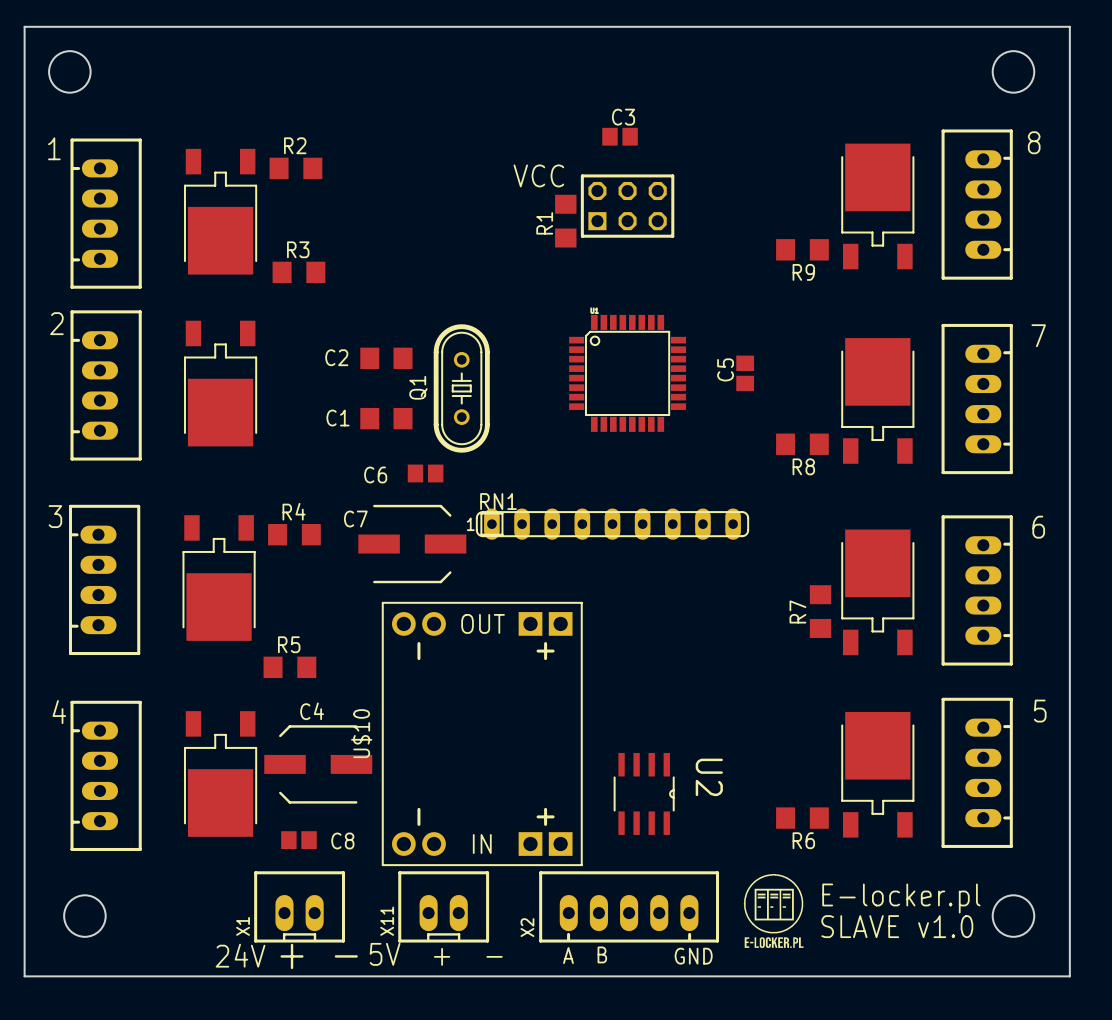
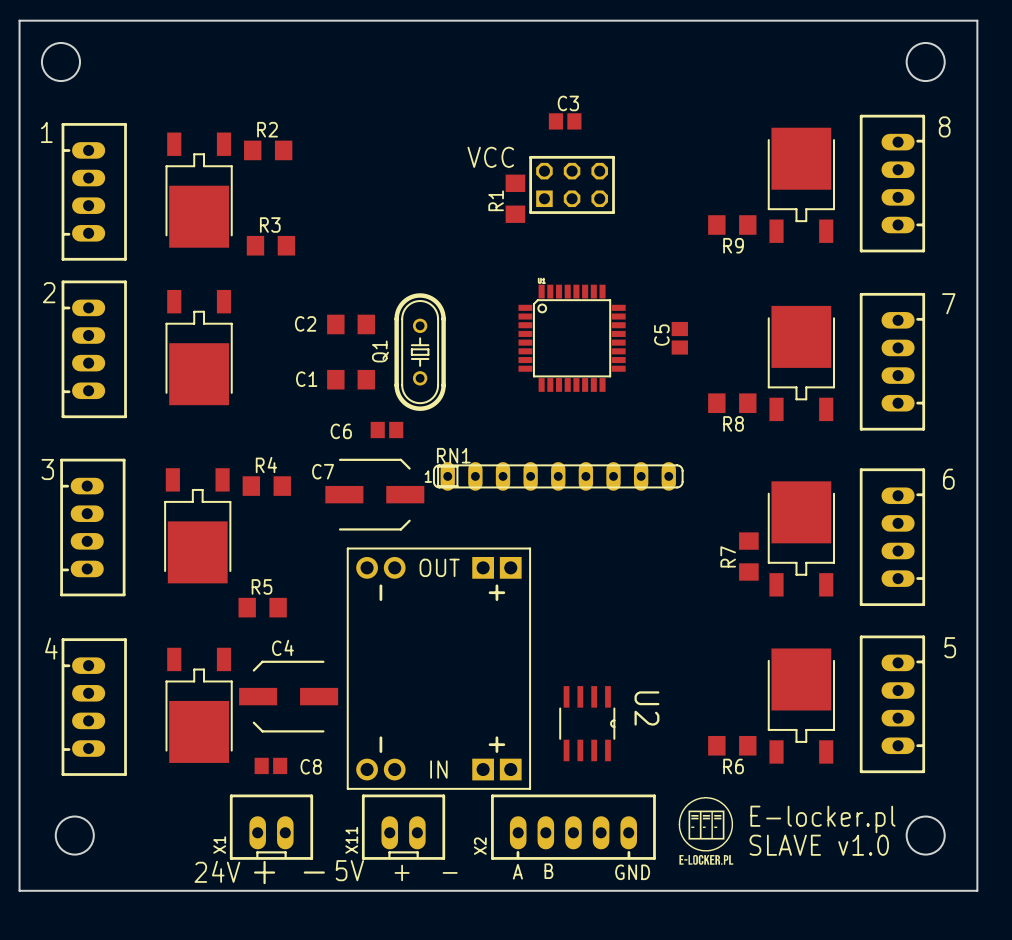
U$10 name: U$10 (361, 733) -> none

